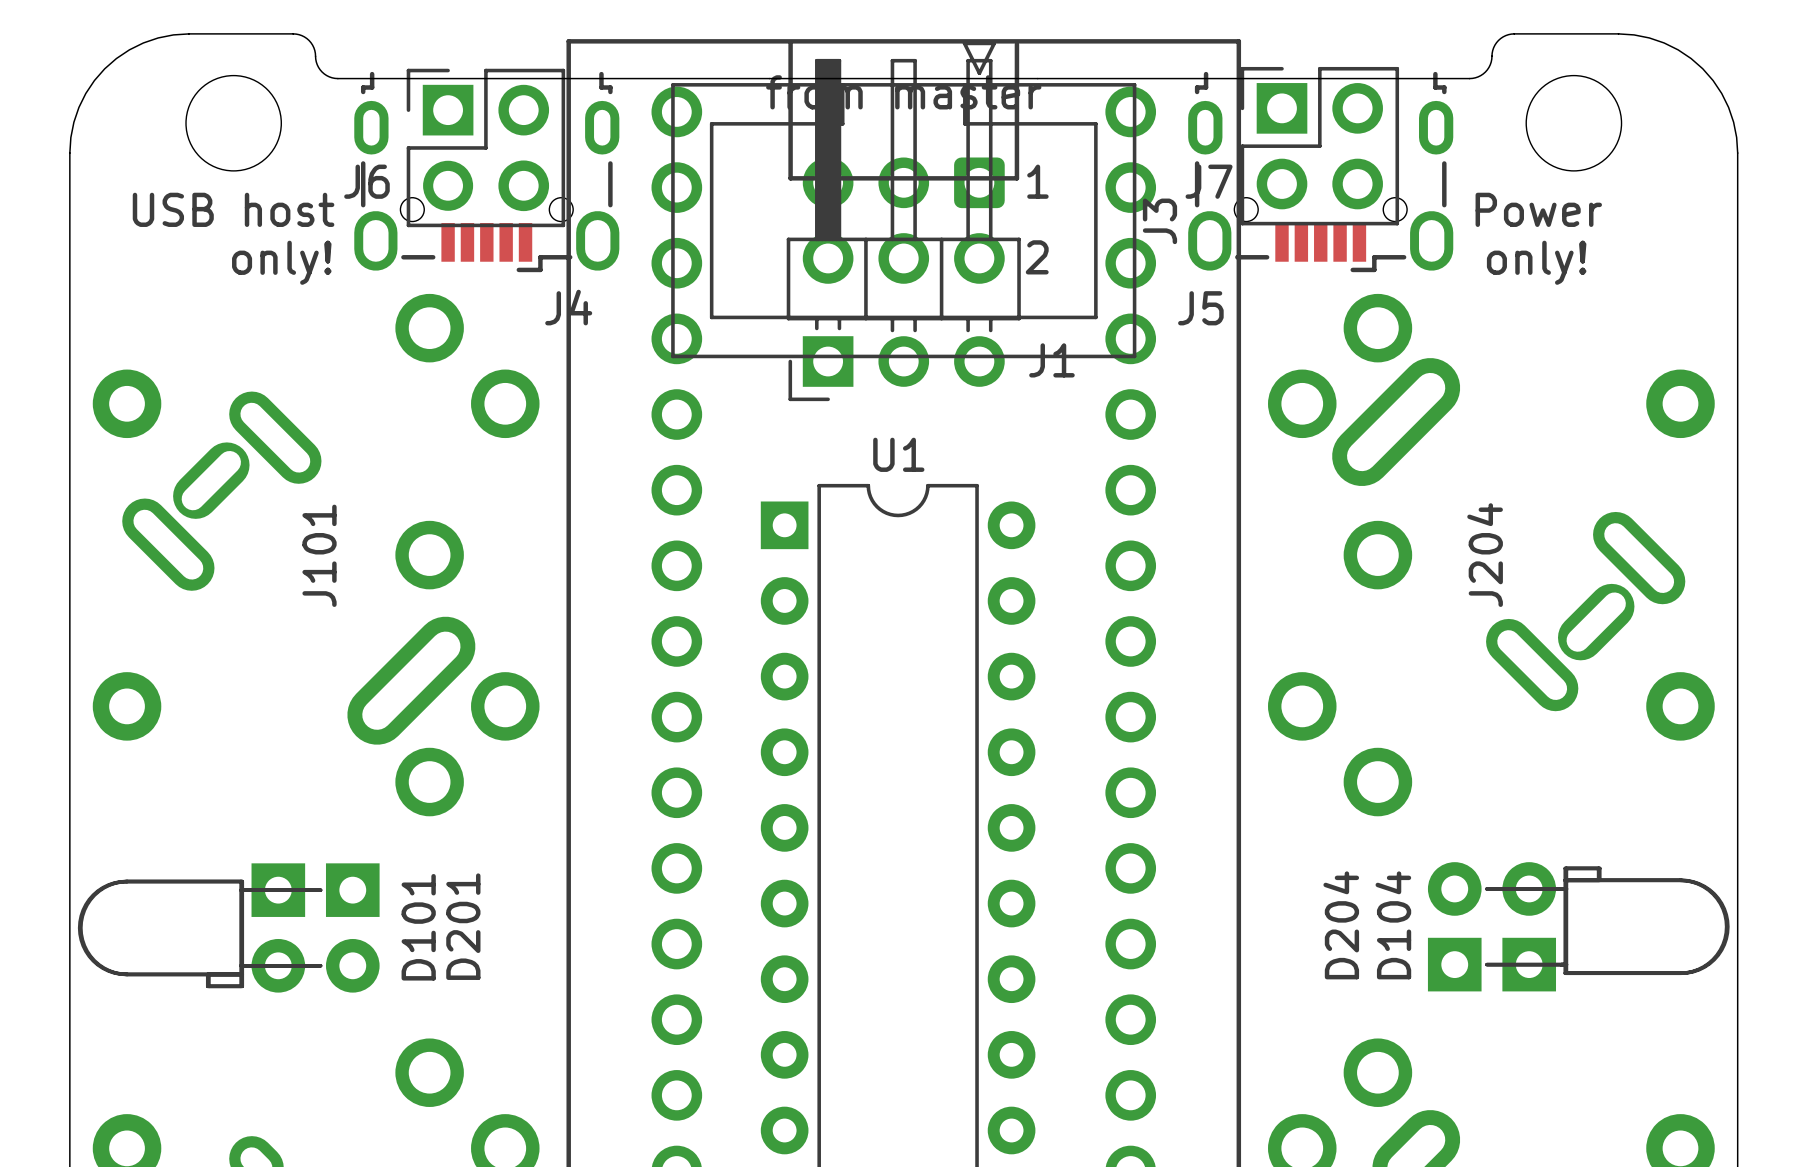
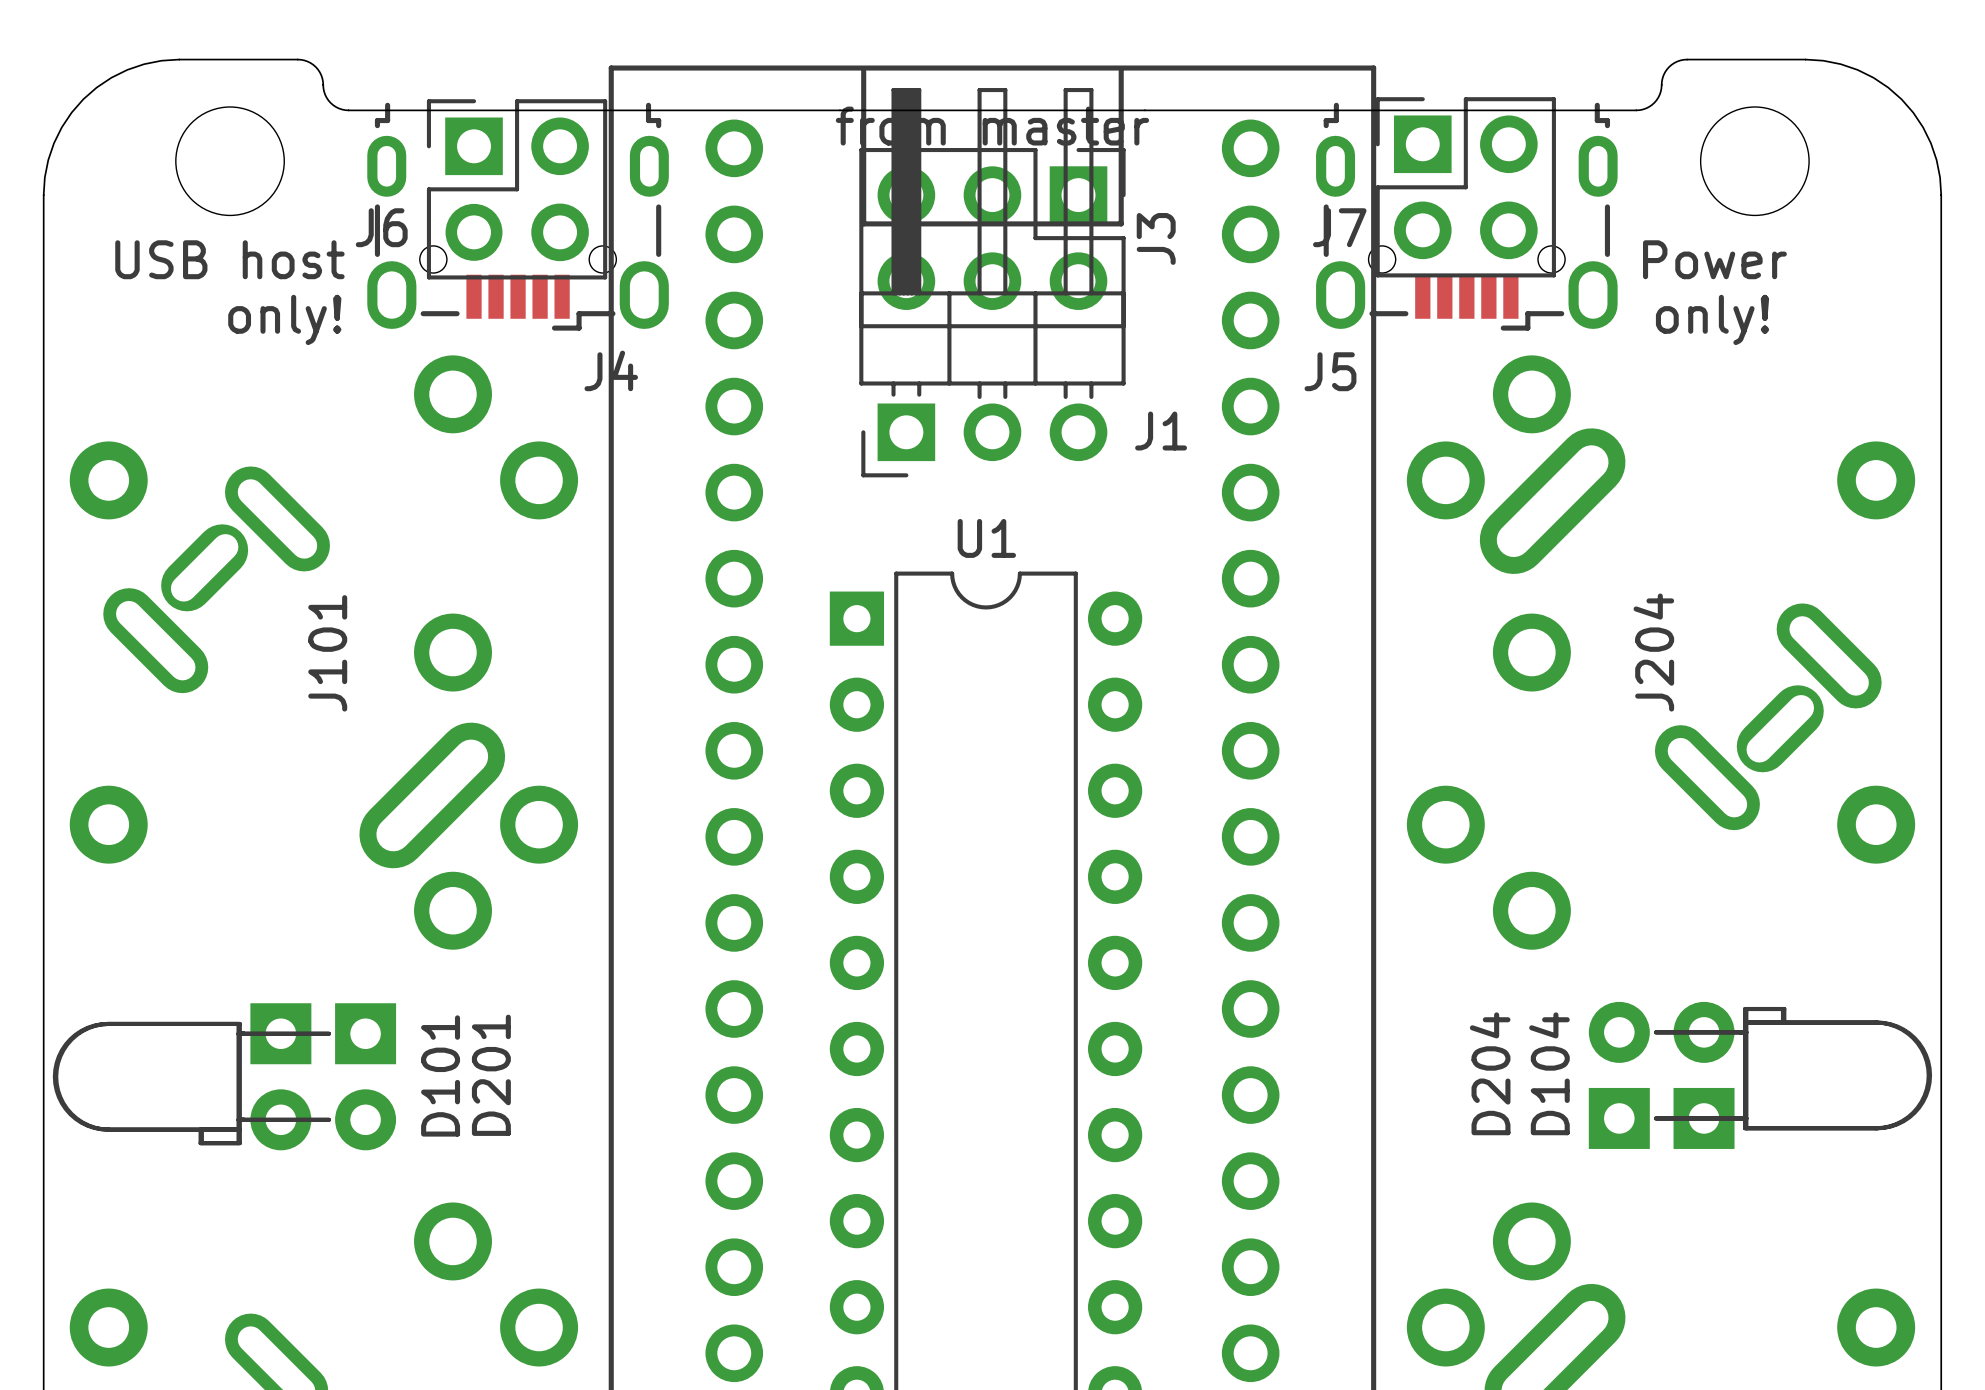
J3 footprint: [671, 41, 1137, 359] -> [859, 147, 1126, 329]
text: 1 (1037, 181) -> none
J3 name position: J3 (1159, 221) -> J3 (1156, 238)
text: 2 (1037, 257) -> none

